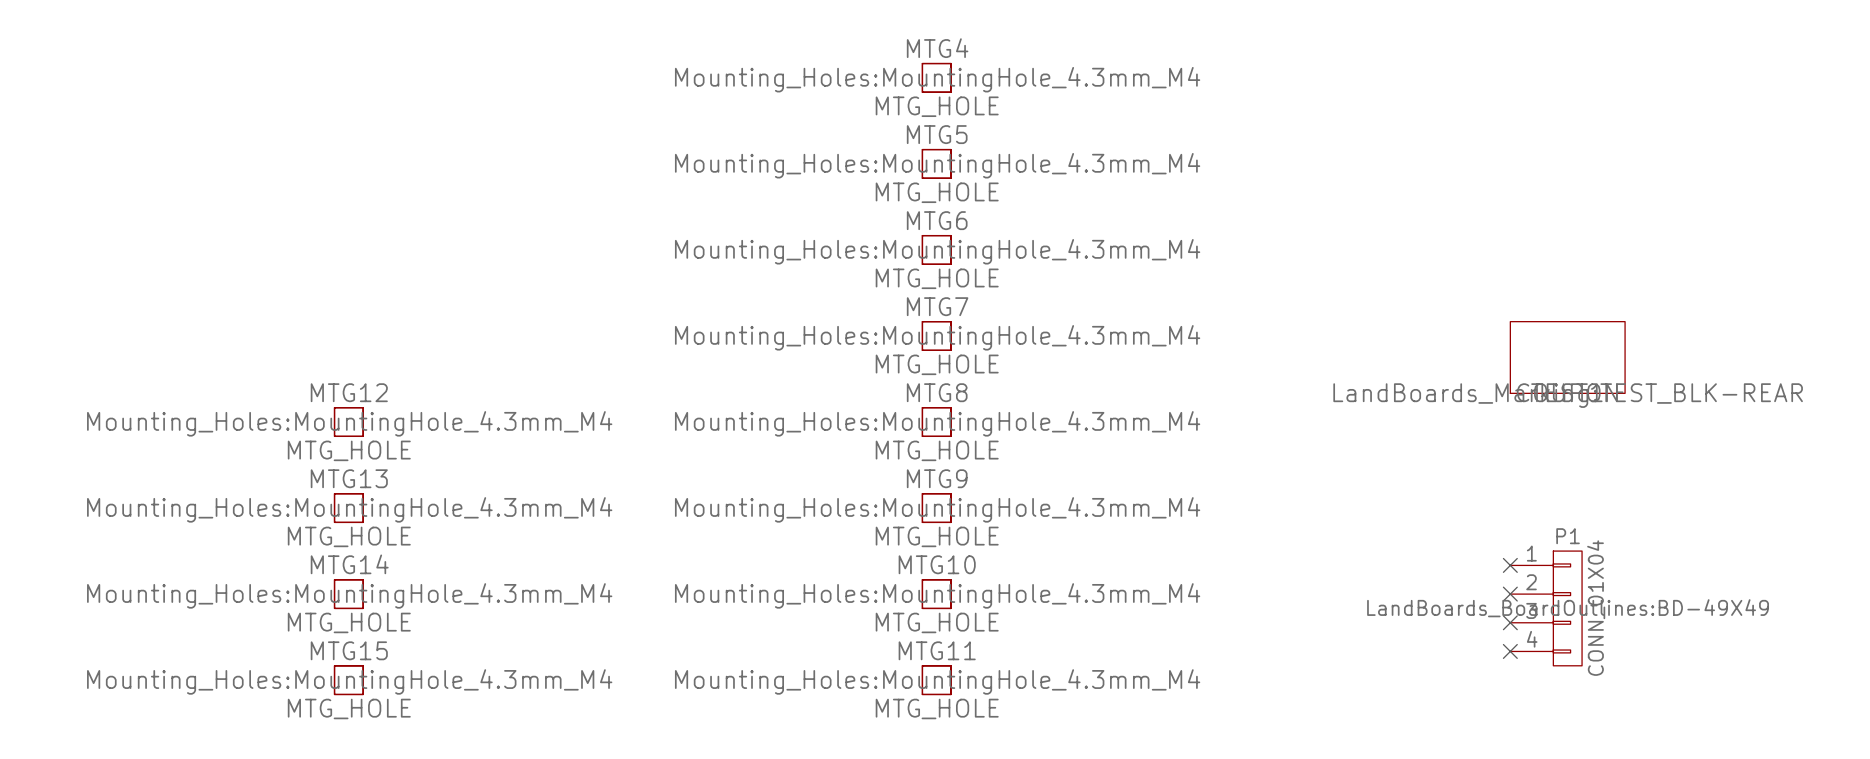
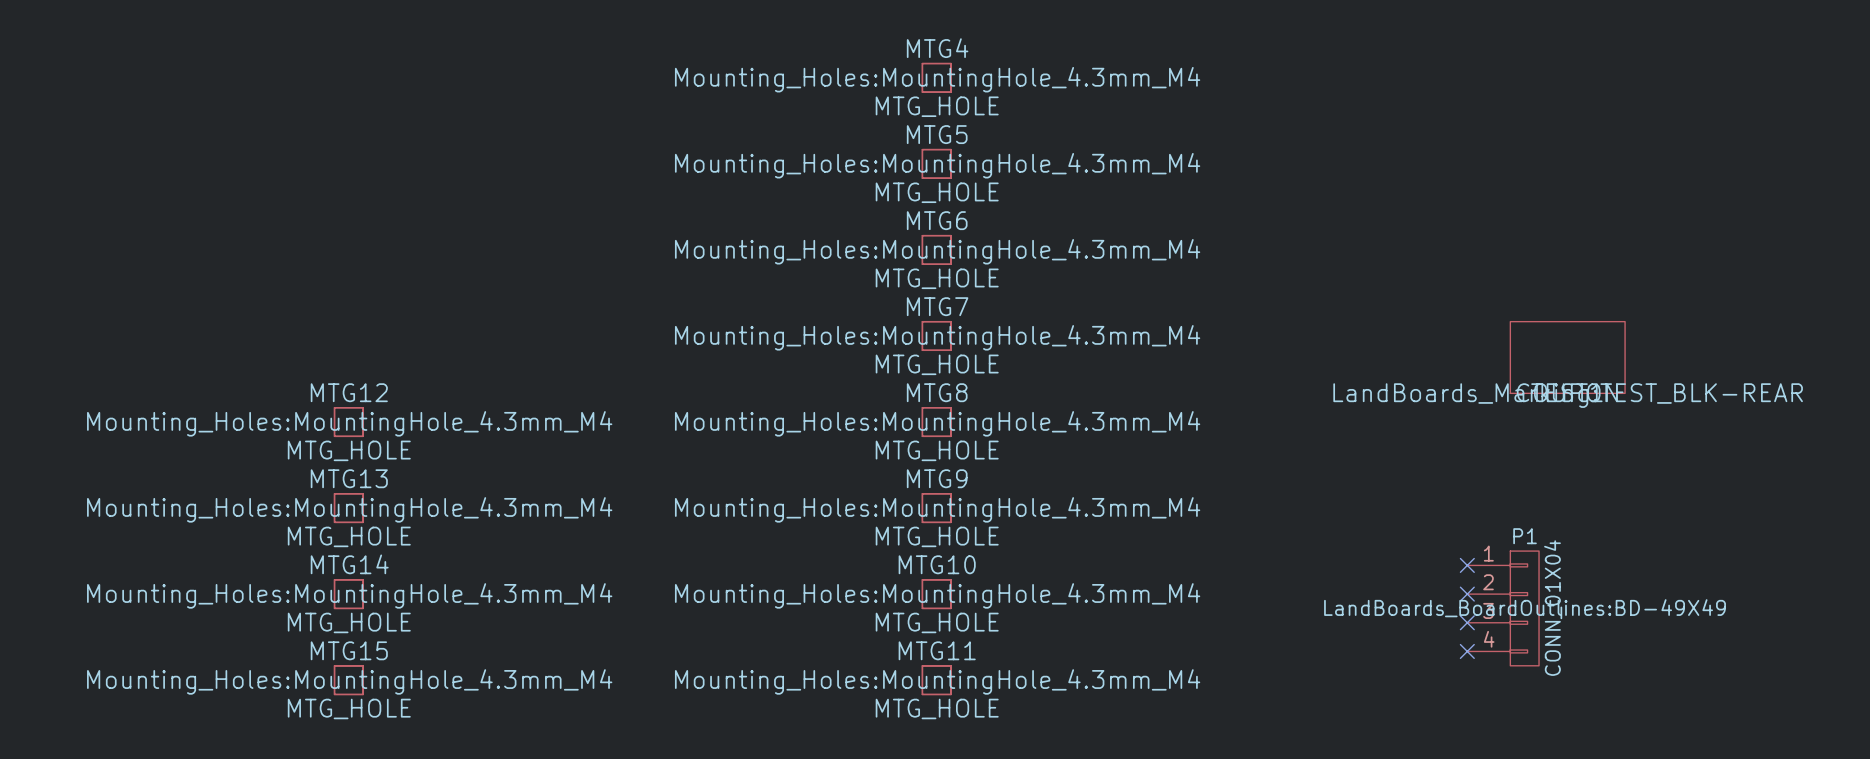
no-connect mark: none -> (1467, 565)
no-connect mark: (1510, 565) -> none
no-connect mark: none -> (1467, 594)
no-connect mark: (1510, 594) -> none
P1 position: (1546, 608) -> (1503, 608)
no-connect mark: none -> (1467, 622)
no-connect mark: (1510, 622) -> none
no-connect mark: none -> (1467, 651)
no-connect mark: (1510, 651) -> none

